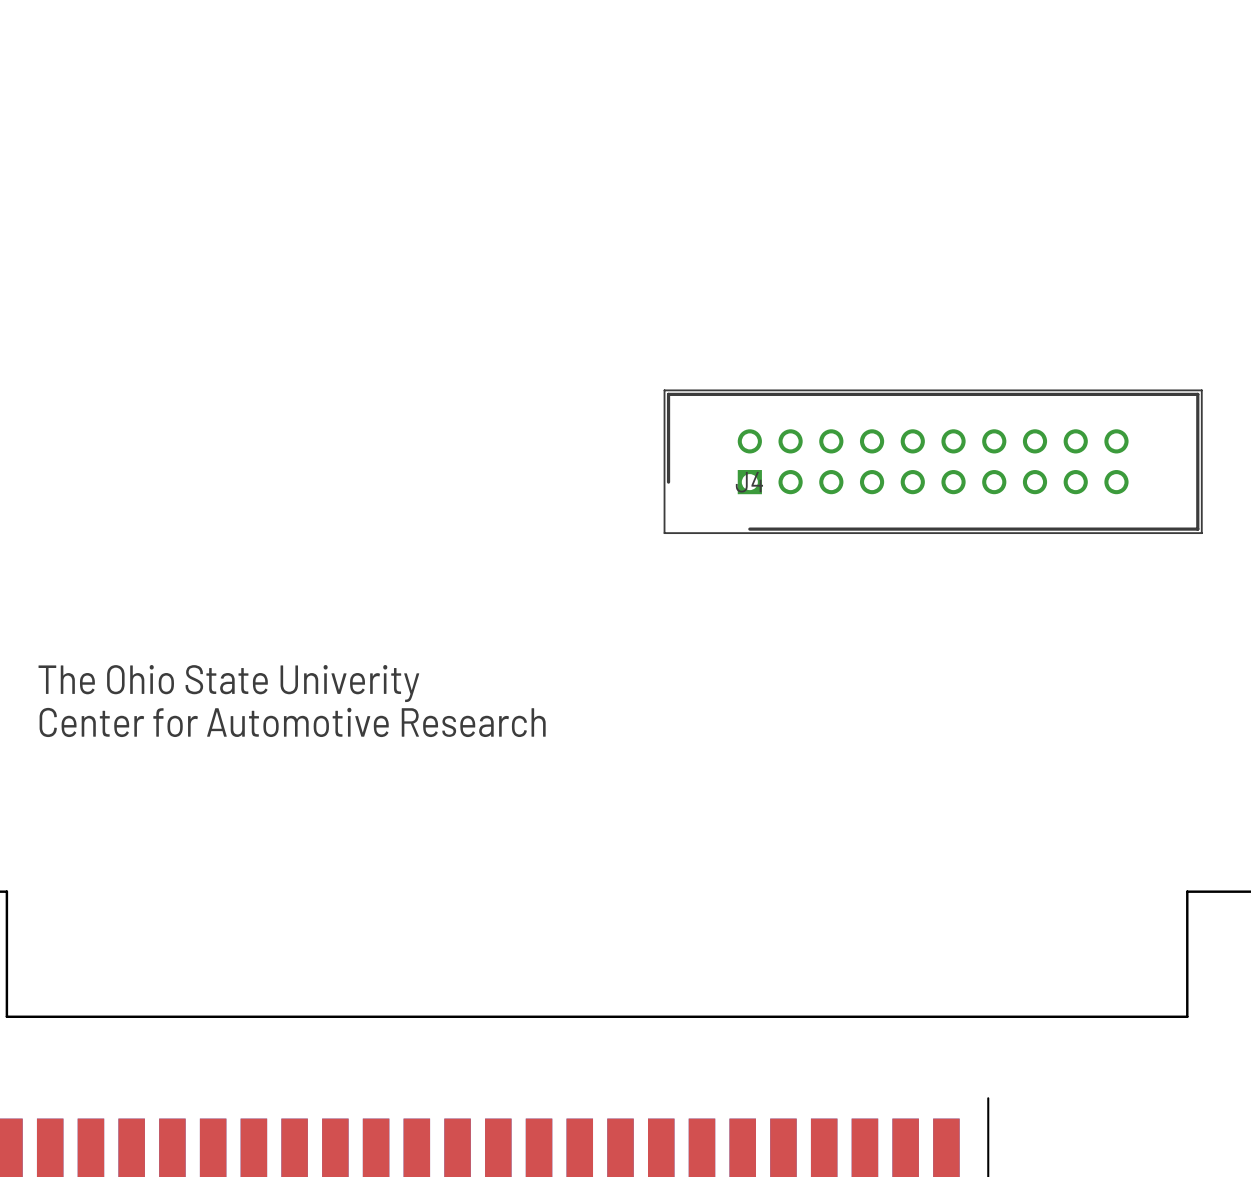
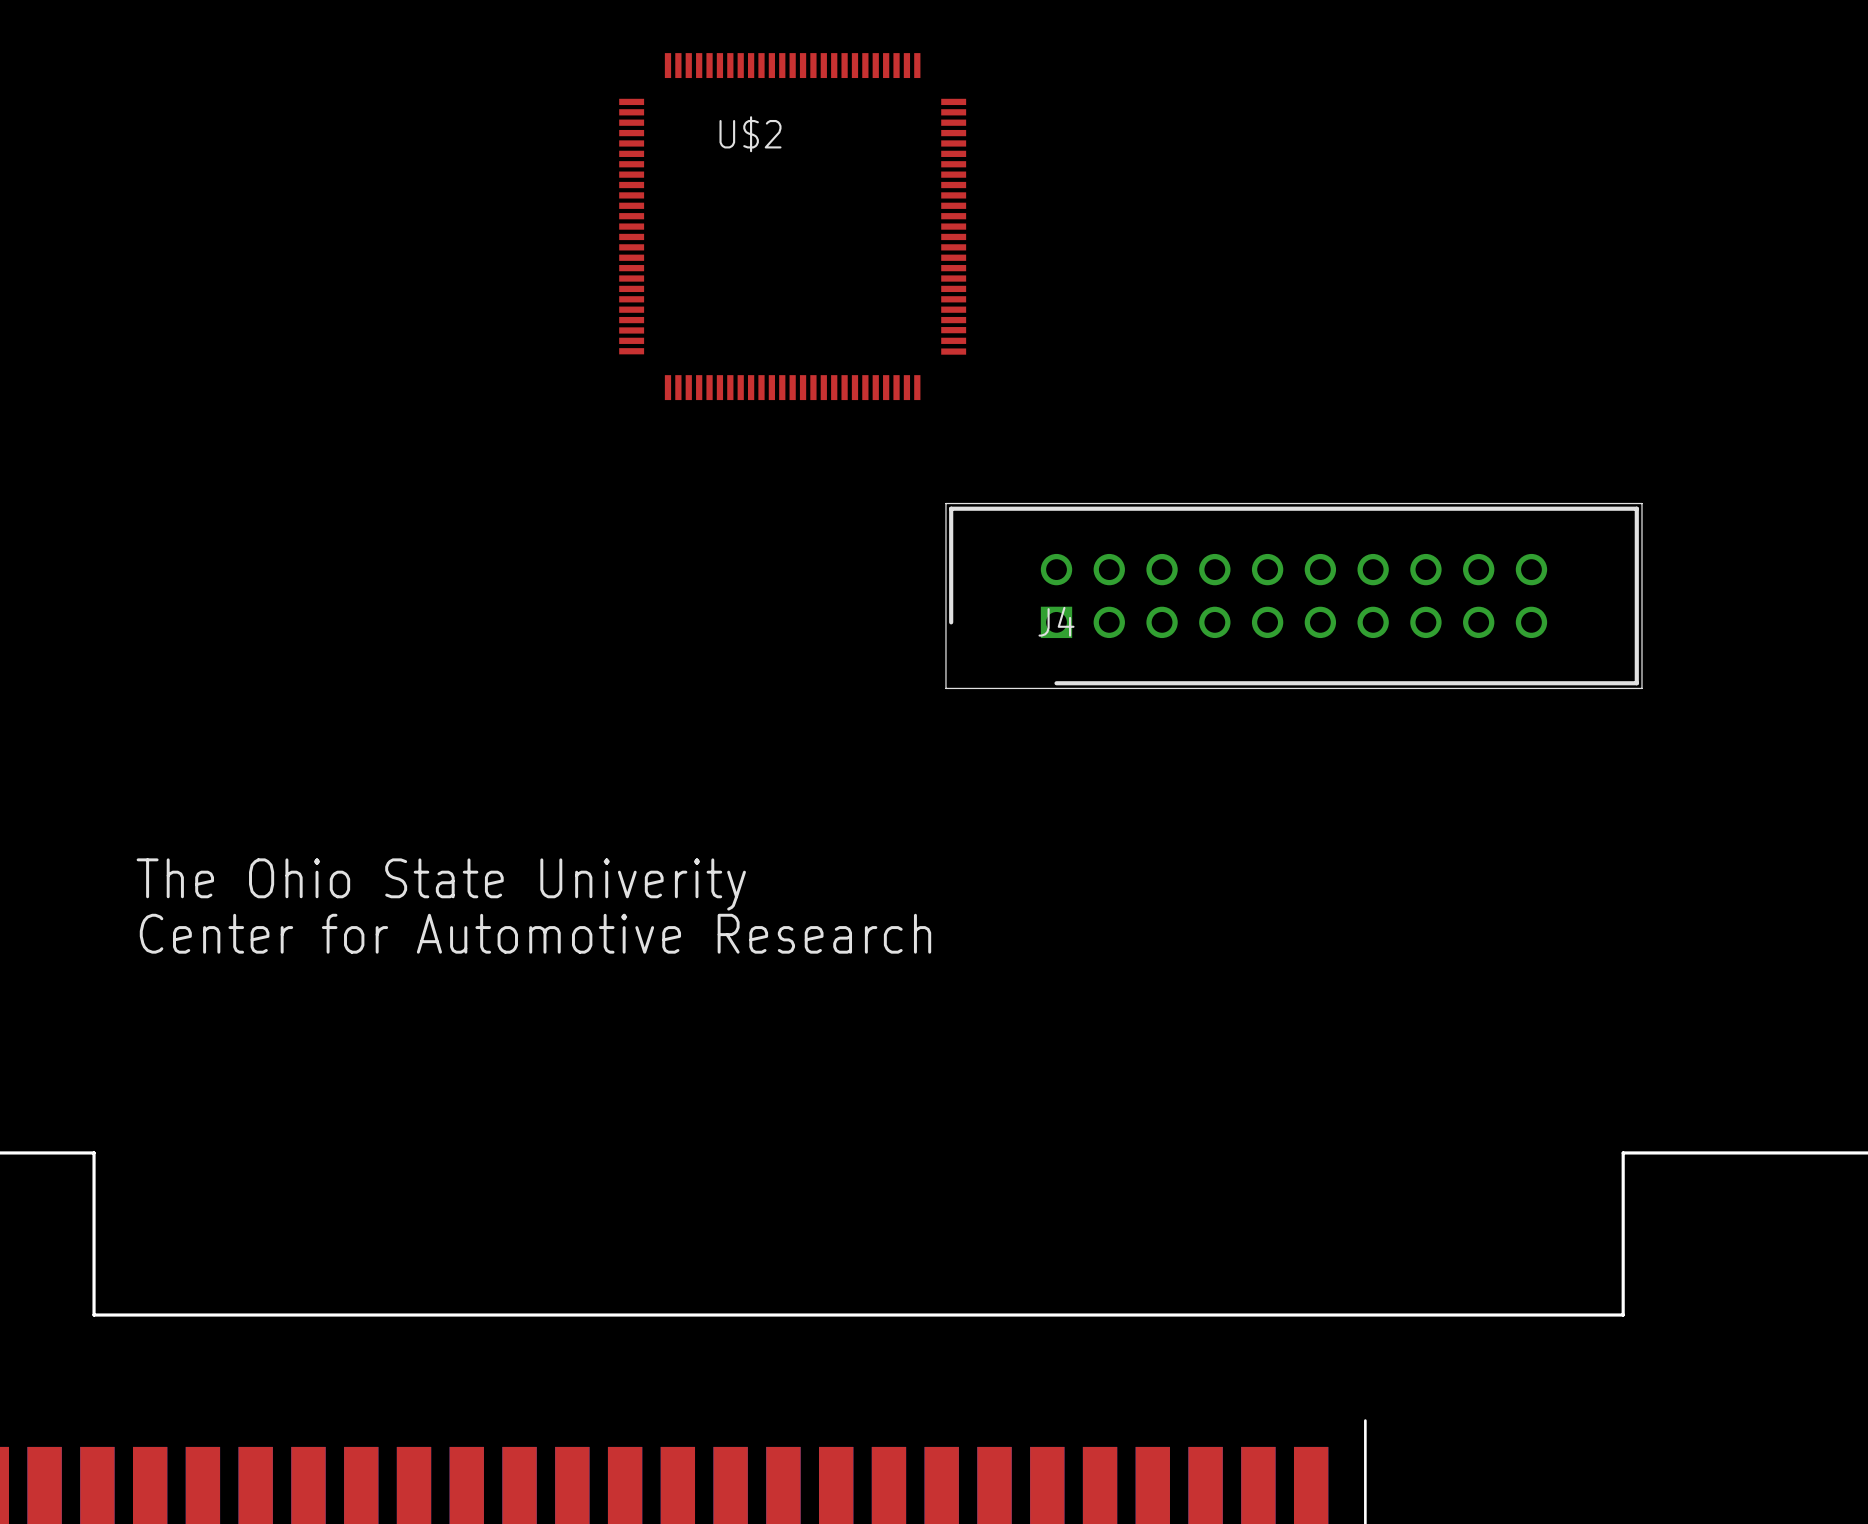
U$2: none -> (792, 226)

